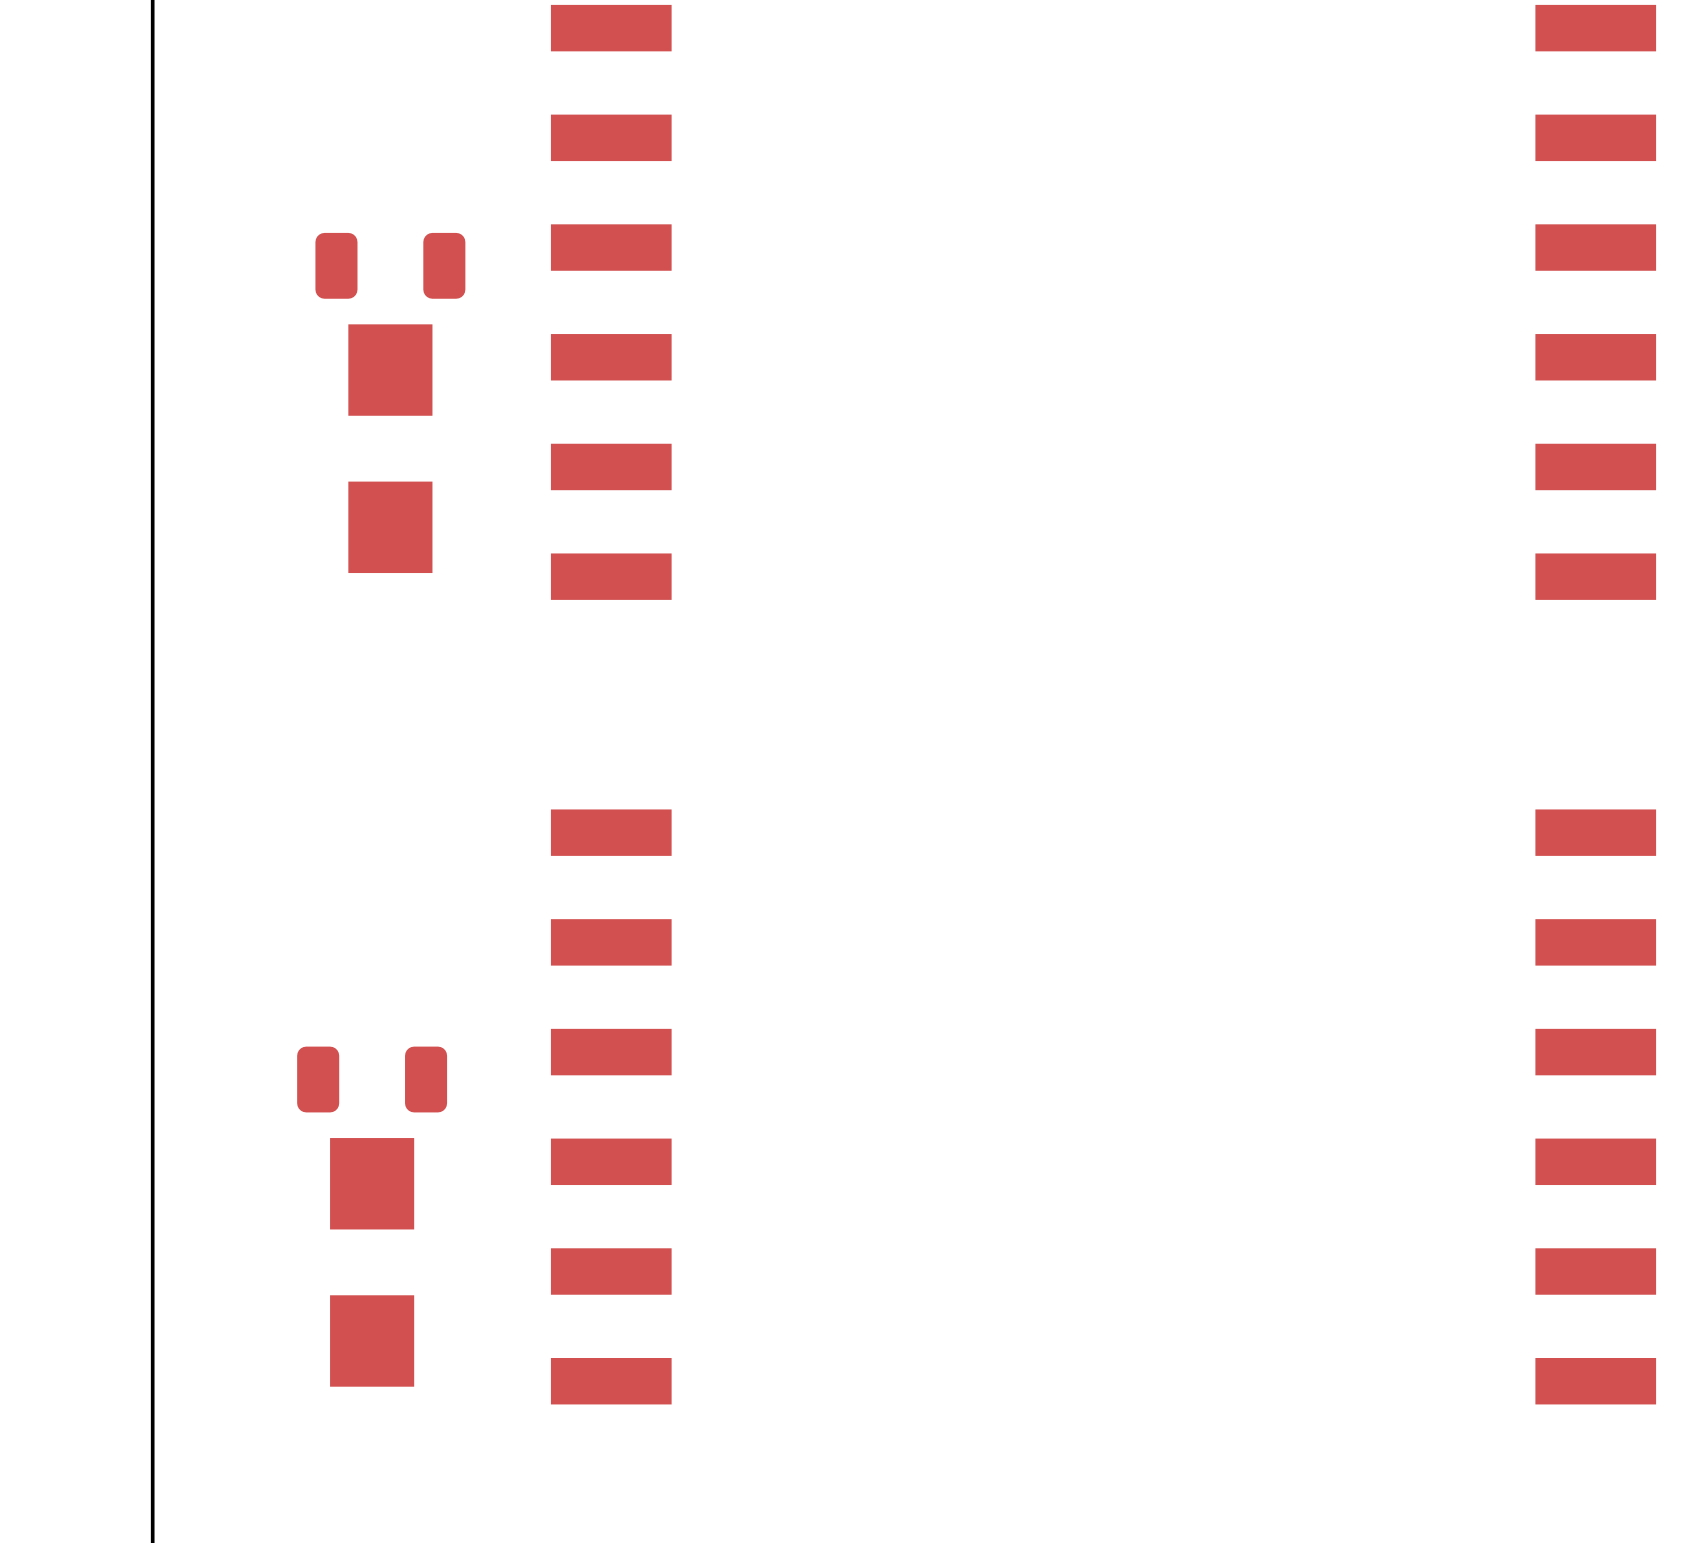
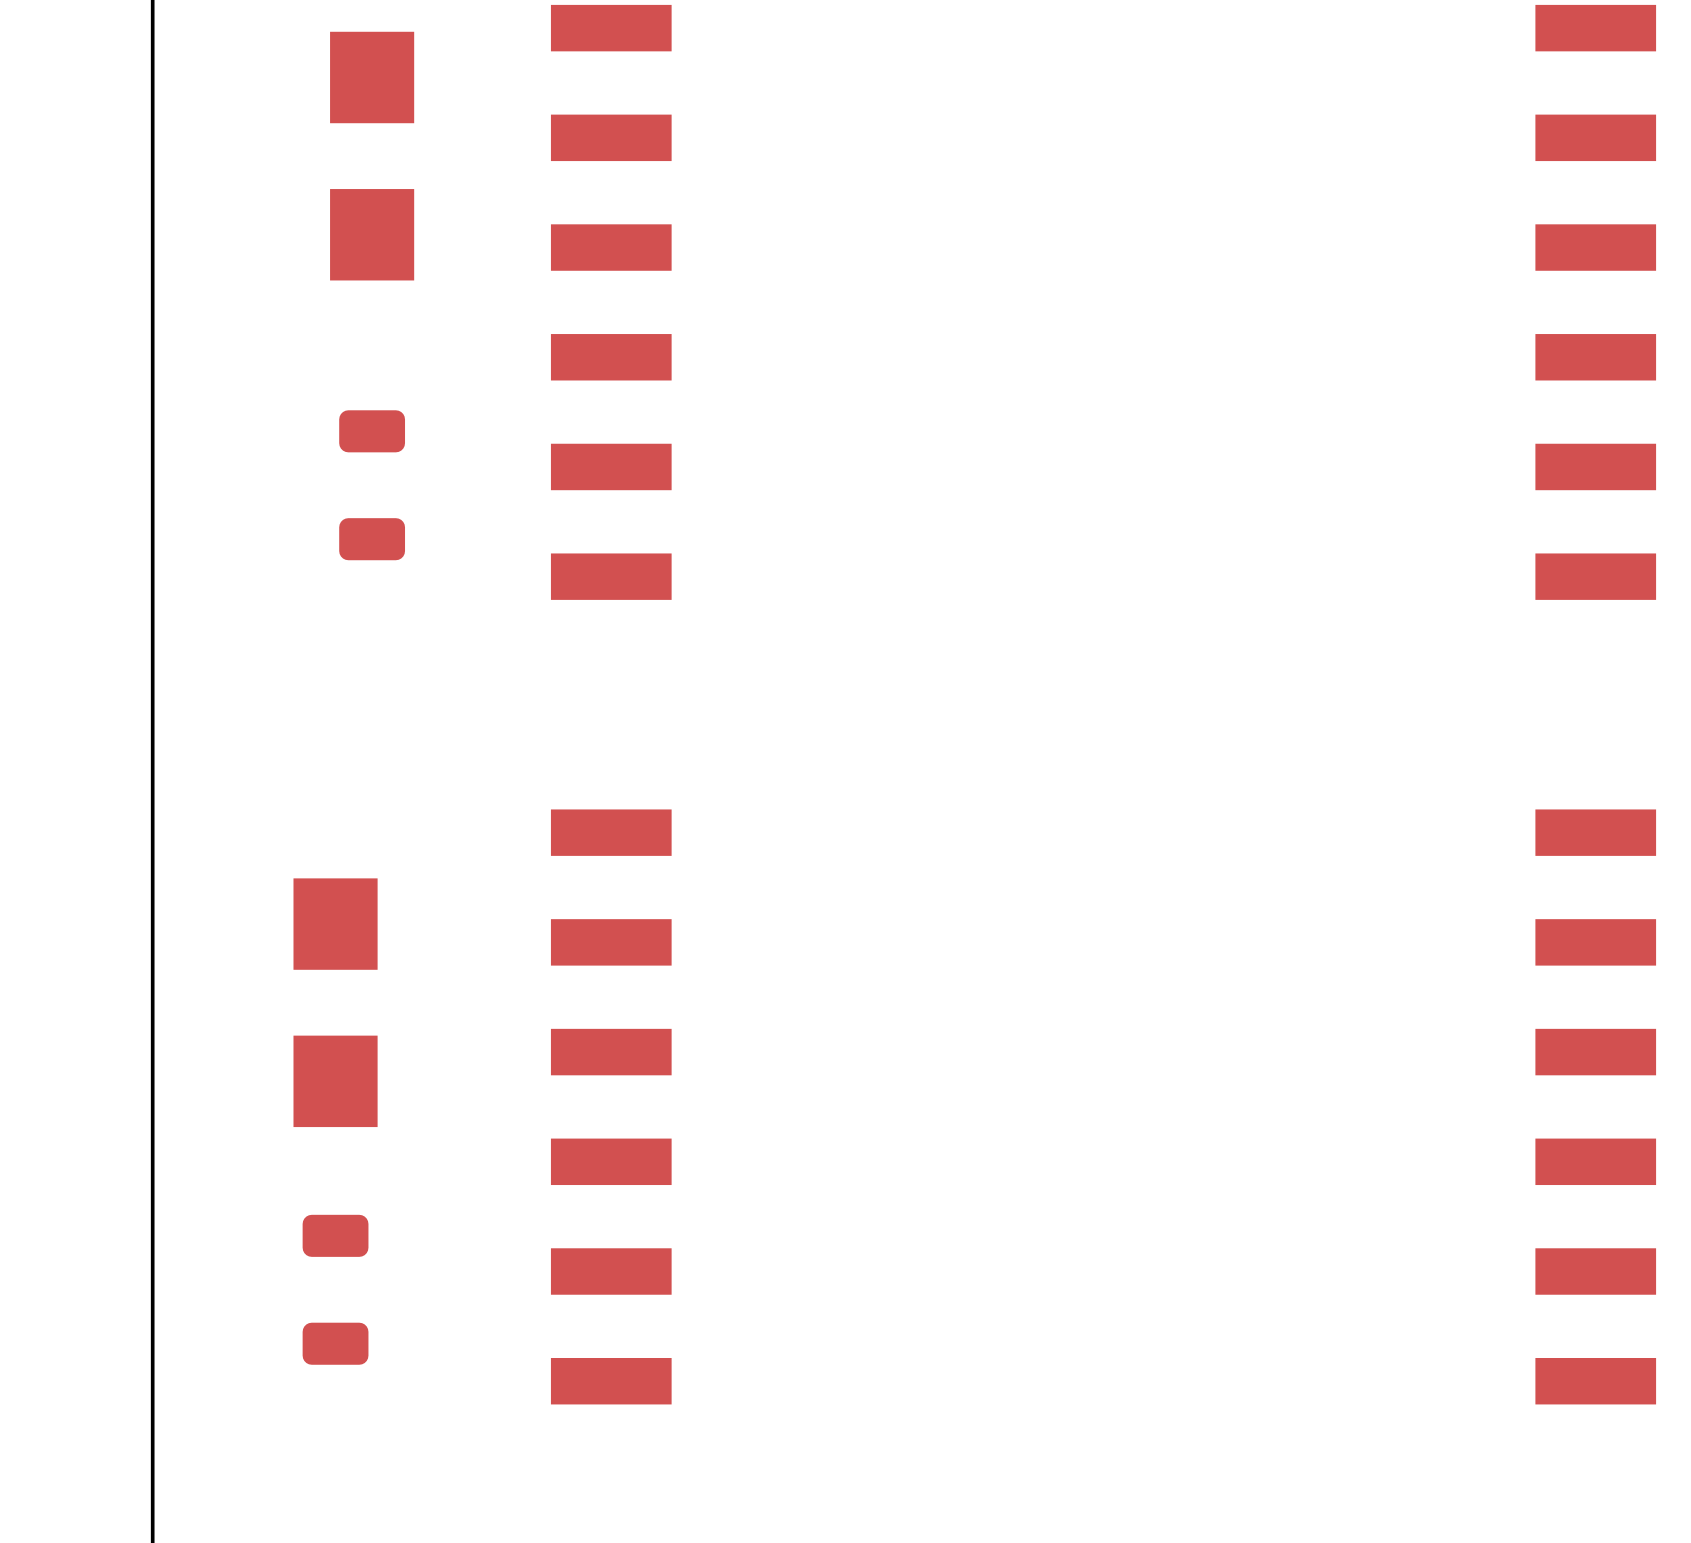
part: none -> (372, 156)
part rotation: 0° (390, 265) -> 90° clockwise (372, 485)
part position: (390, 265) -> (372, 485)
part: (390, 448) -> none
part rotation: 0° (372, 1079) -> 90° clockwise (335, 1289)
part position: (372, 1079) -> (335, 1289)
part position: (372, 1262) -> (335, 1002)

